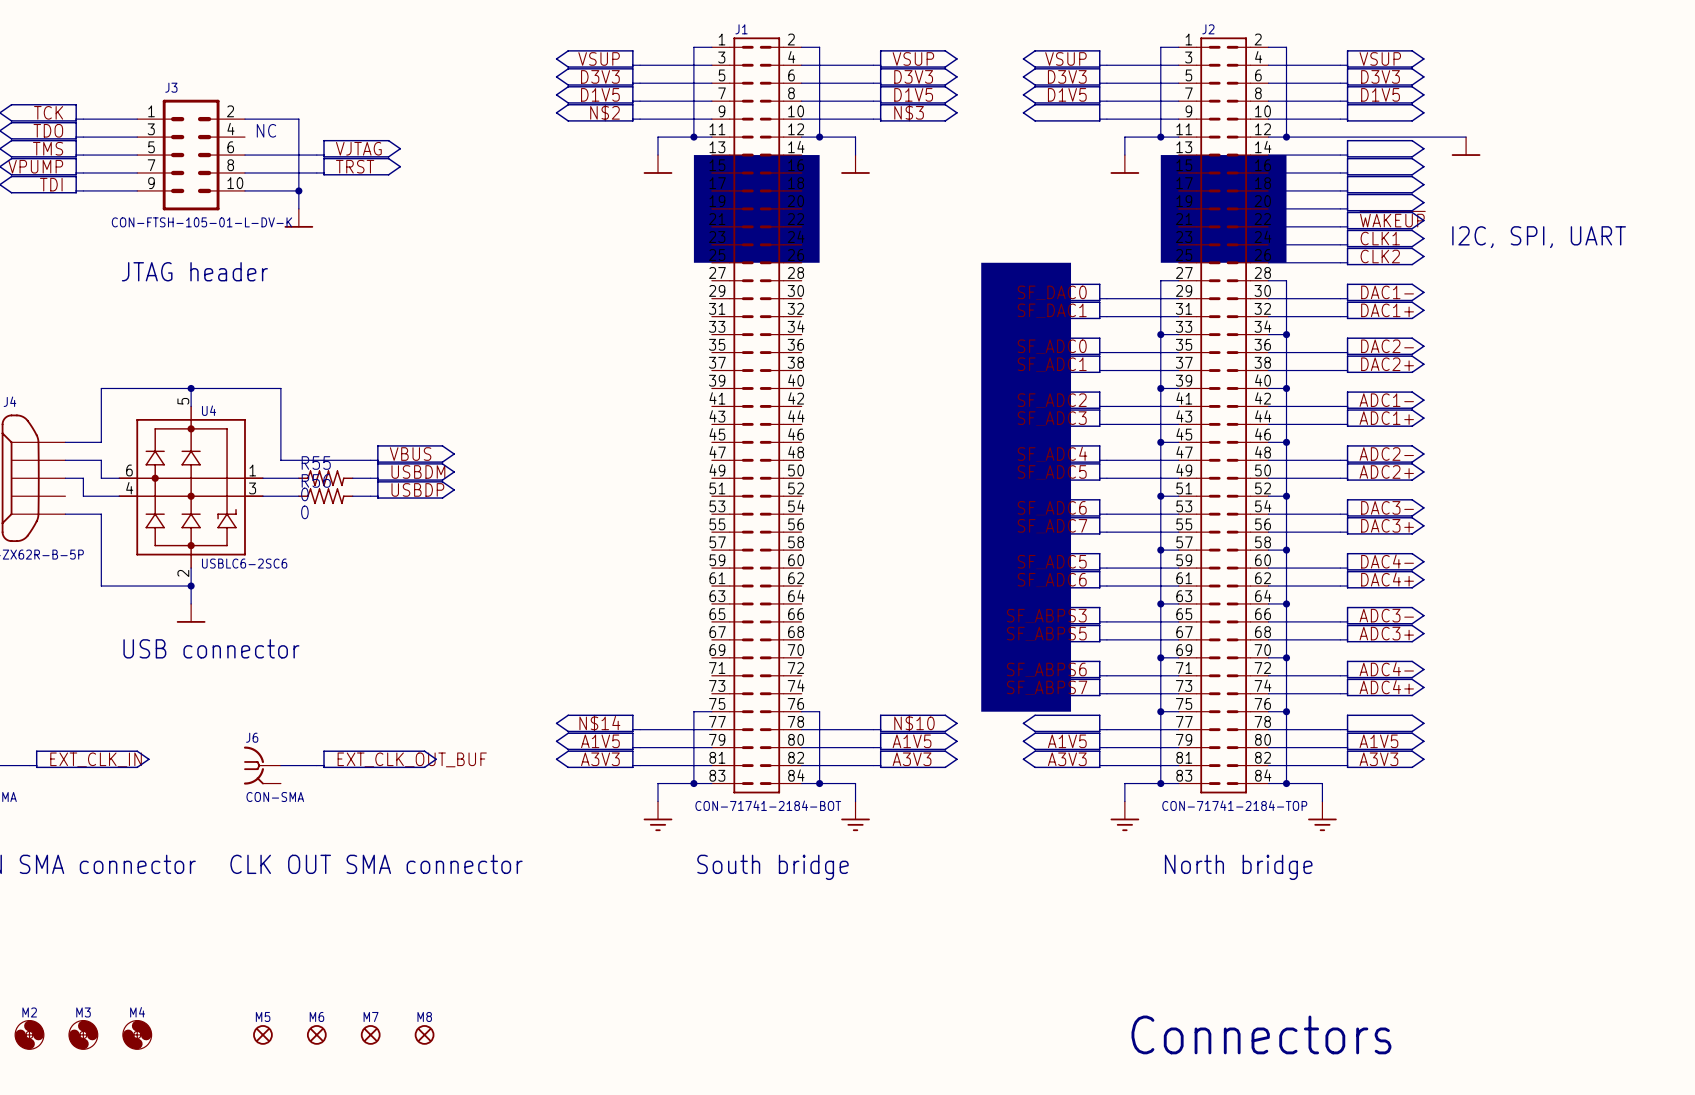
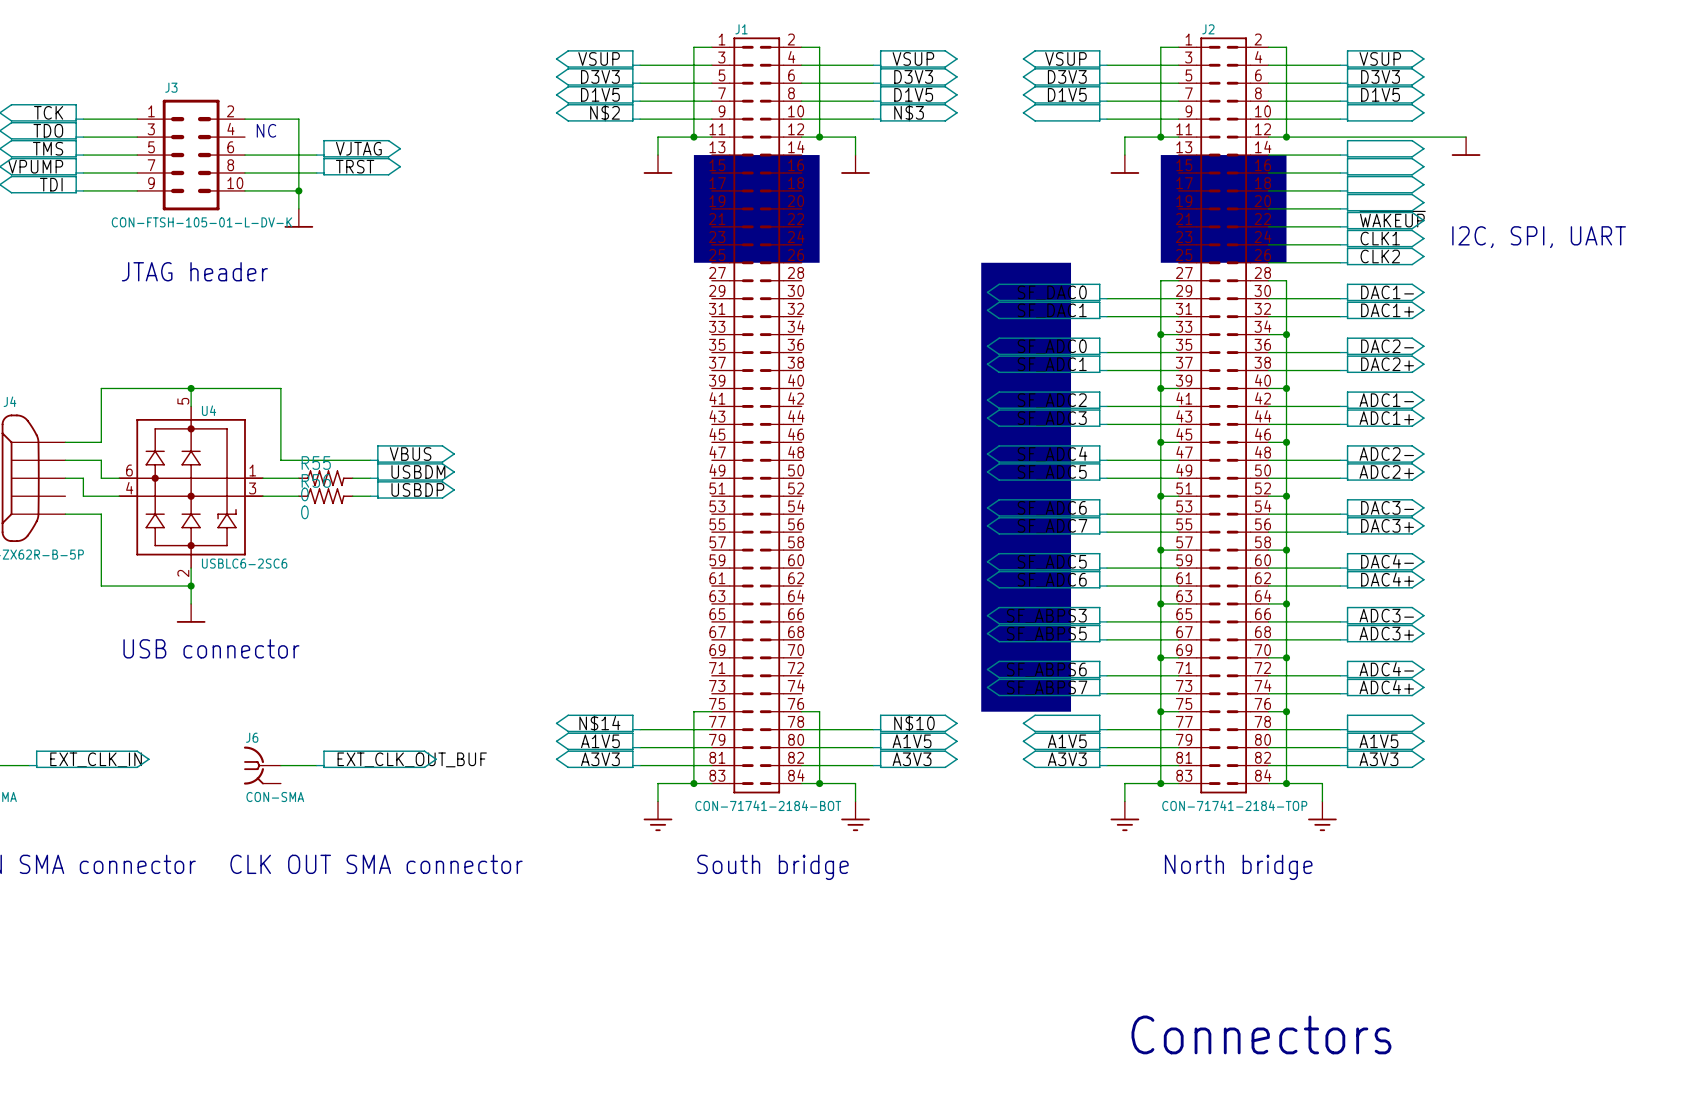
M2: (29, 1034) -> none
M3: (83, 1034) -> none
M4: (137, 1034) -> none
M5: (262, 1034) -> none
M6: (316, 1034) -> none
M7: (370, 1034) -> none
M8: (424, 1034) -> none

